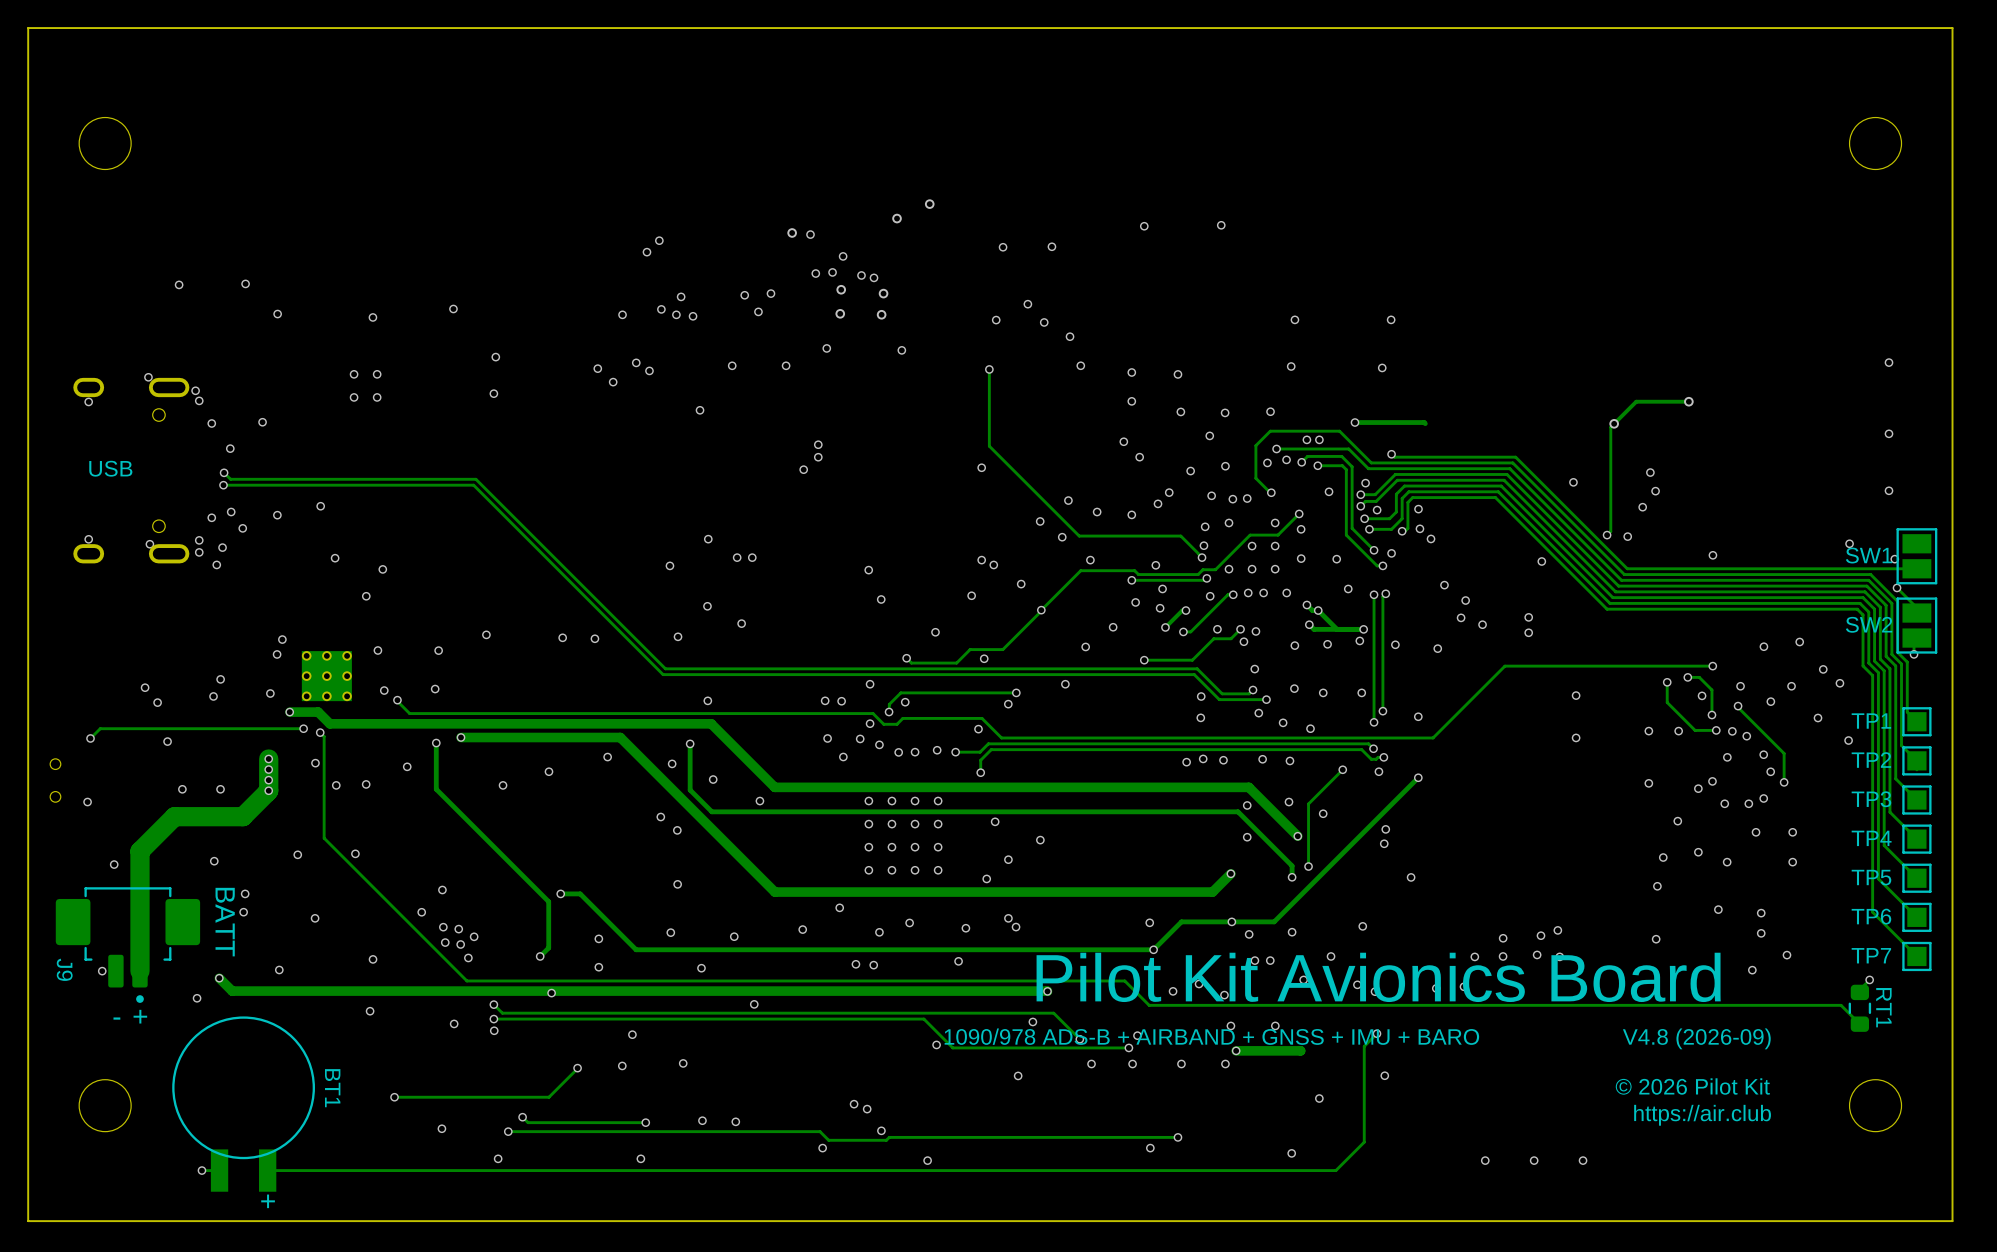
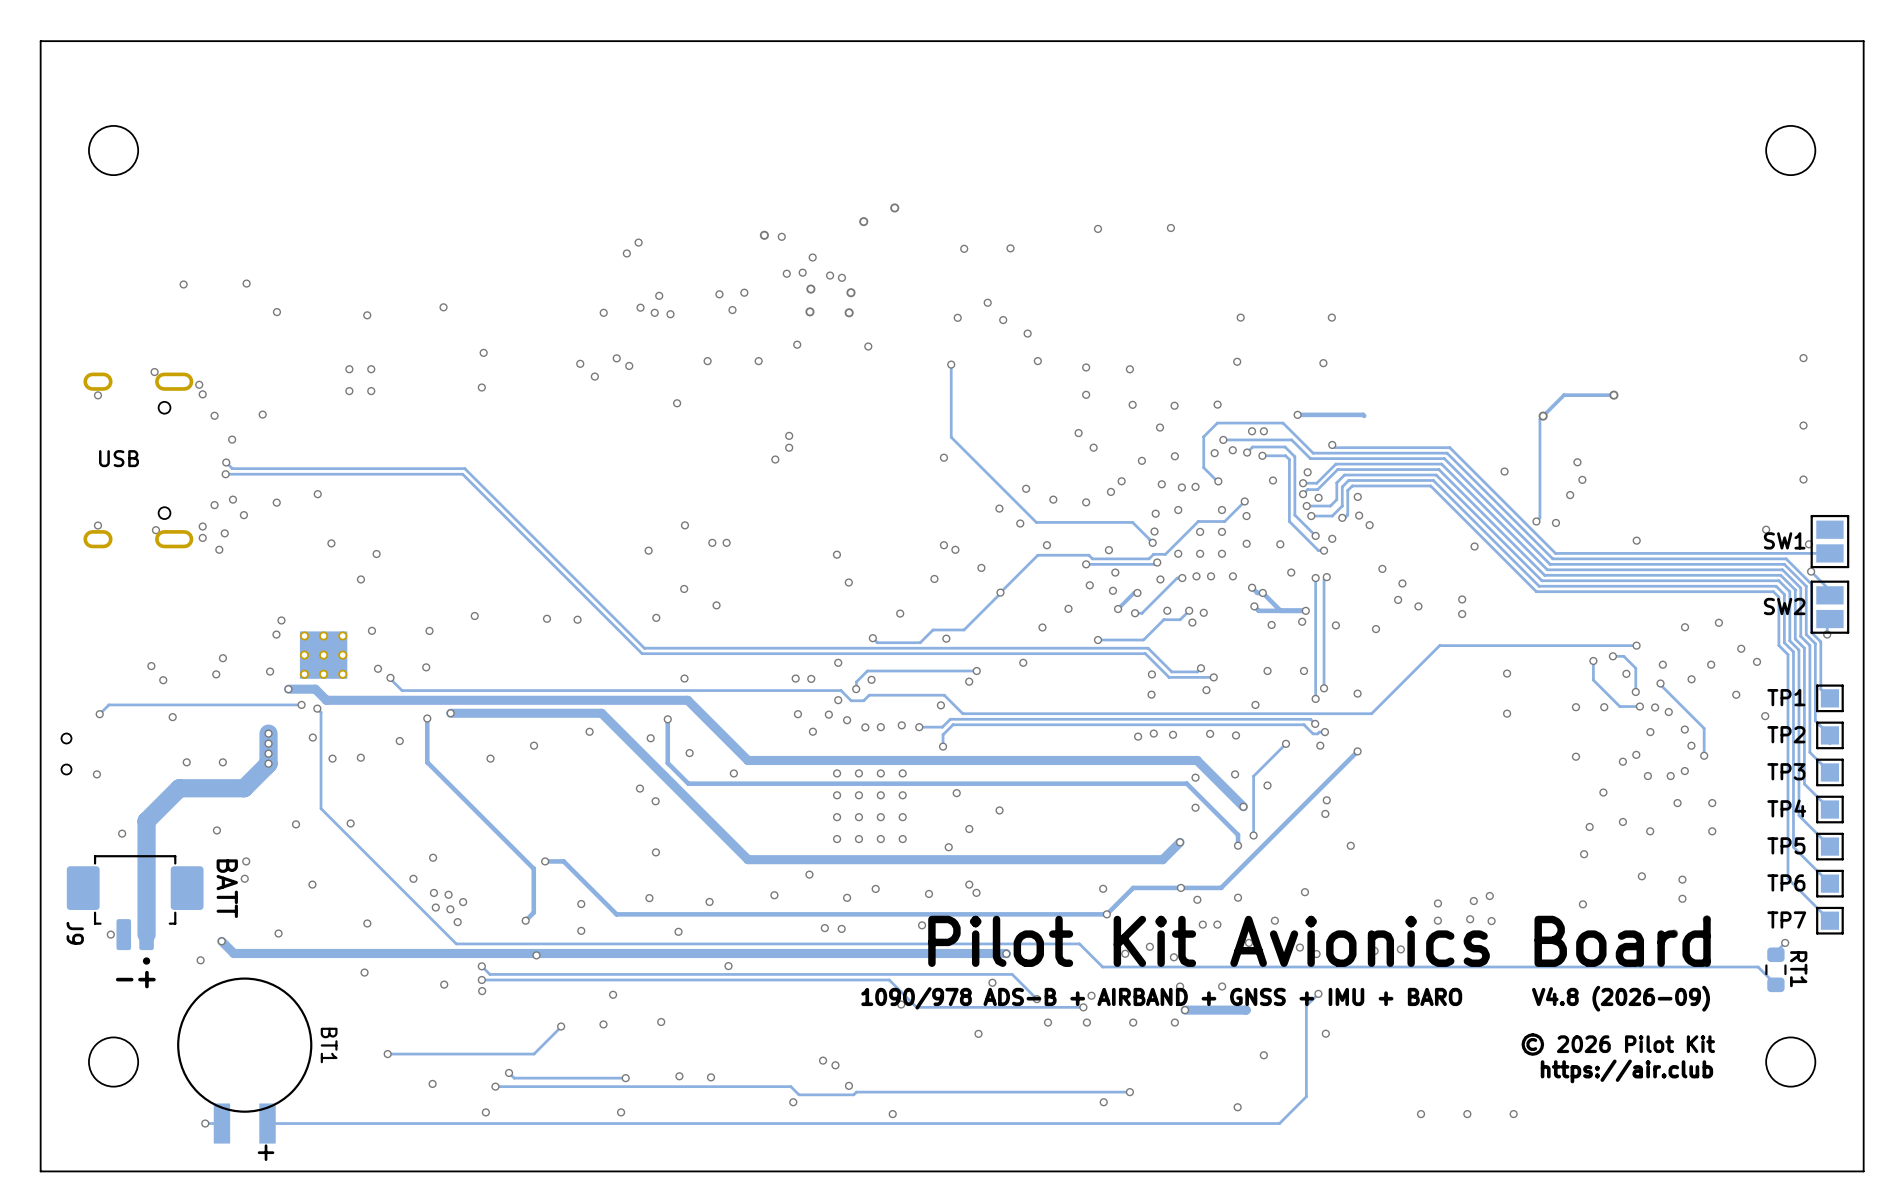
via: (1294, 645) -> none
via: (1254, 669) -> none
via: (1294, 688) -> none
via: (1283, 722) -> none

